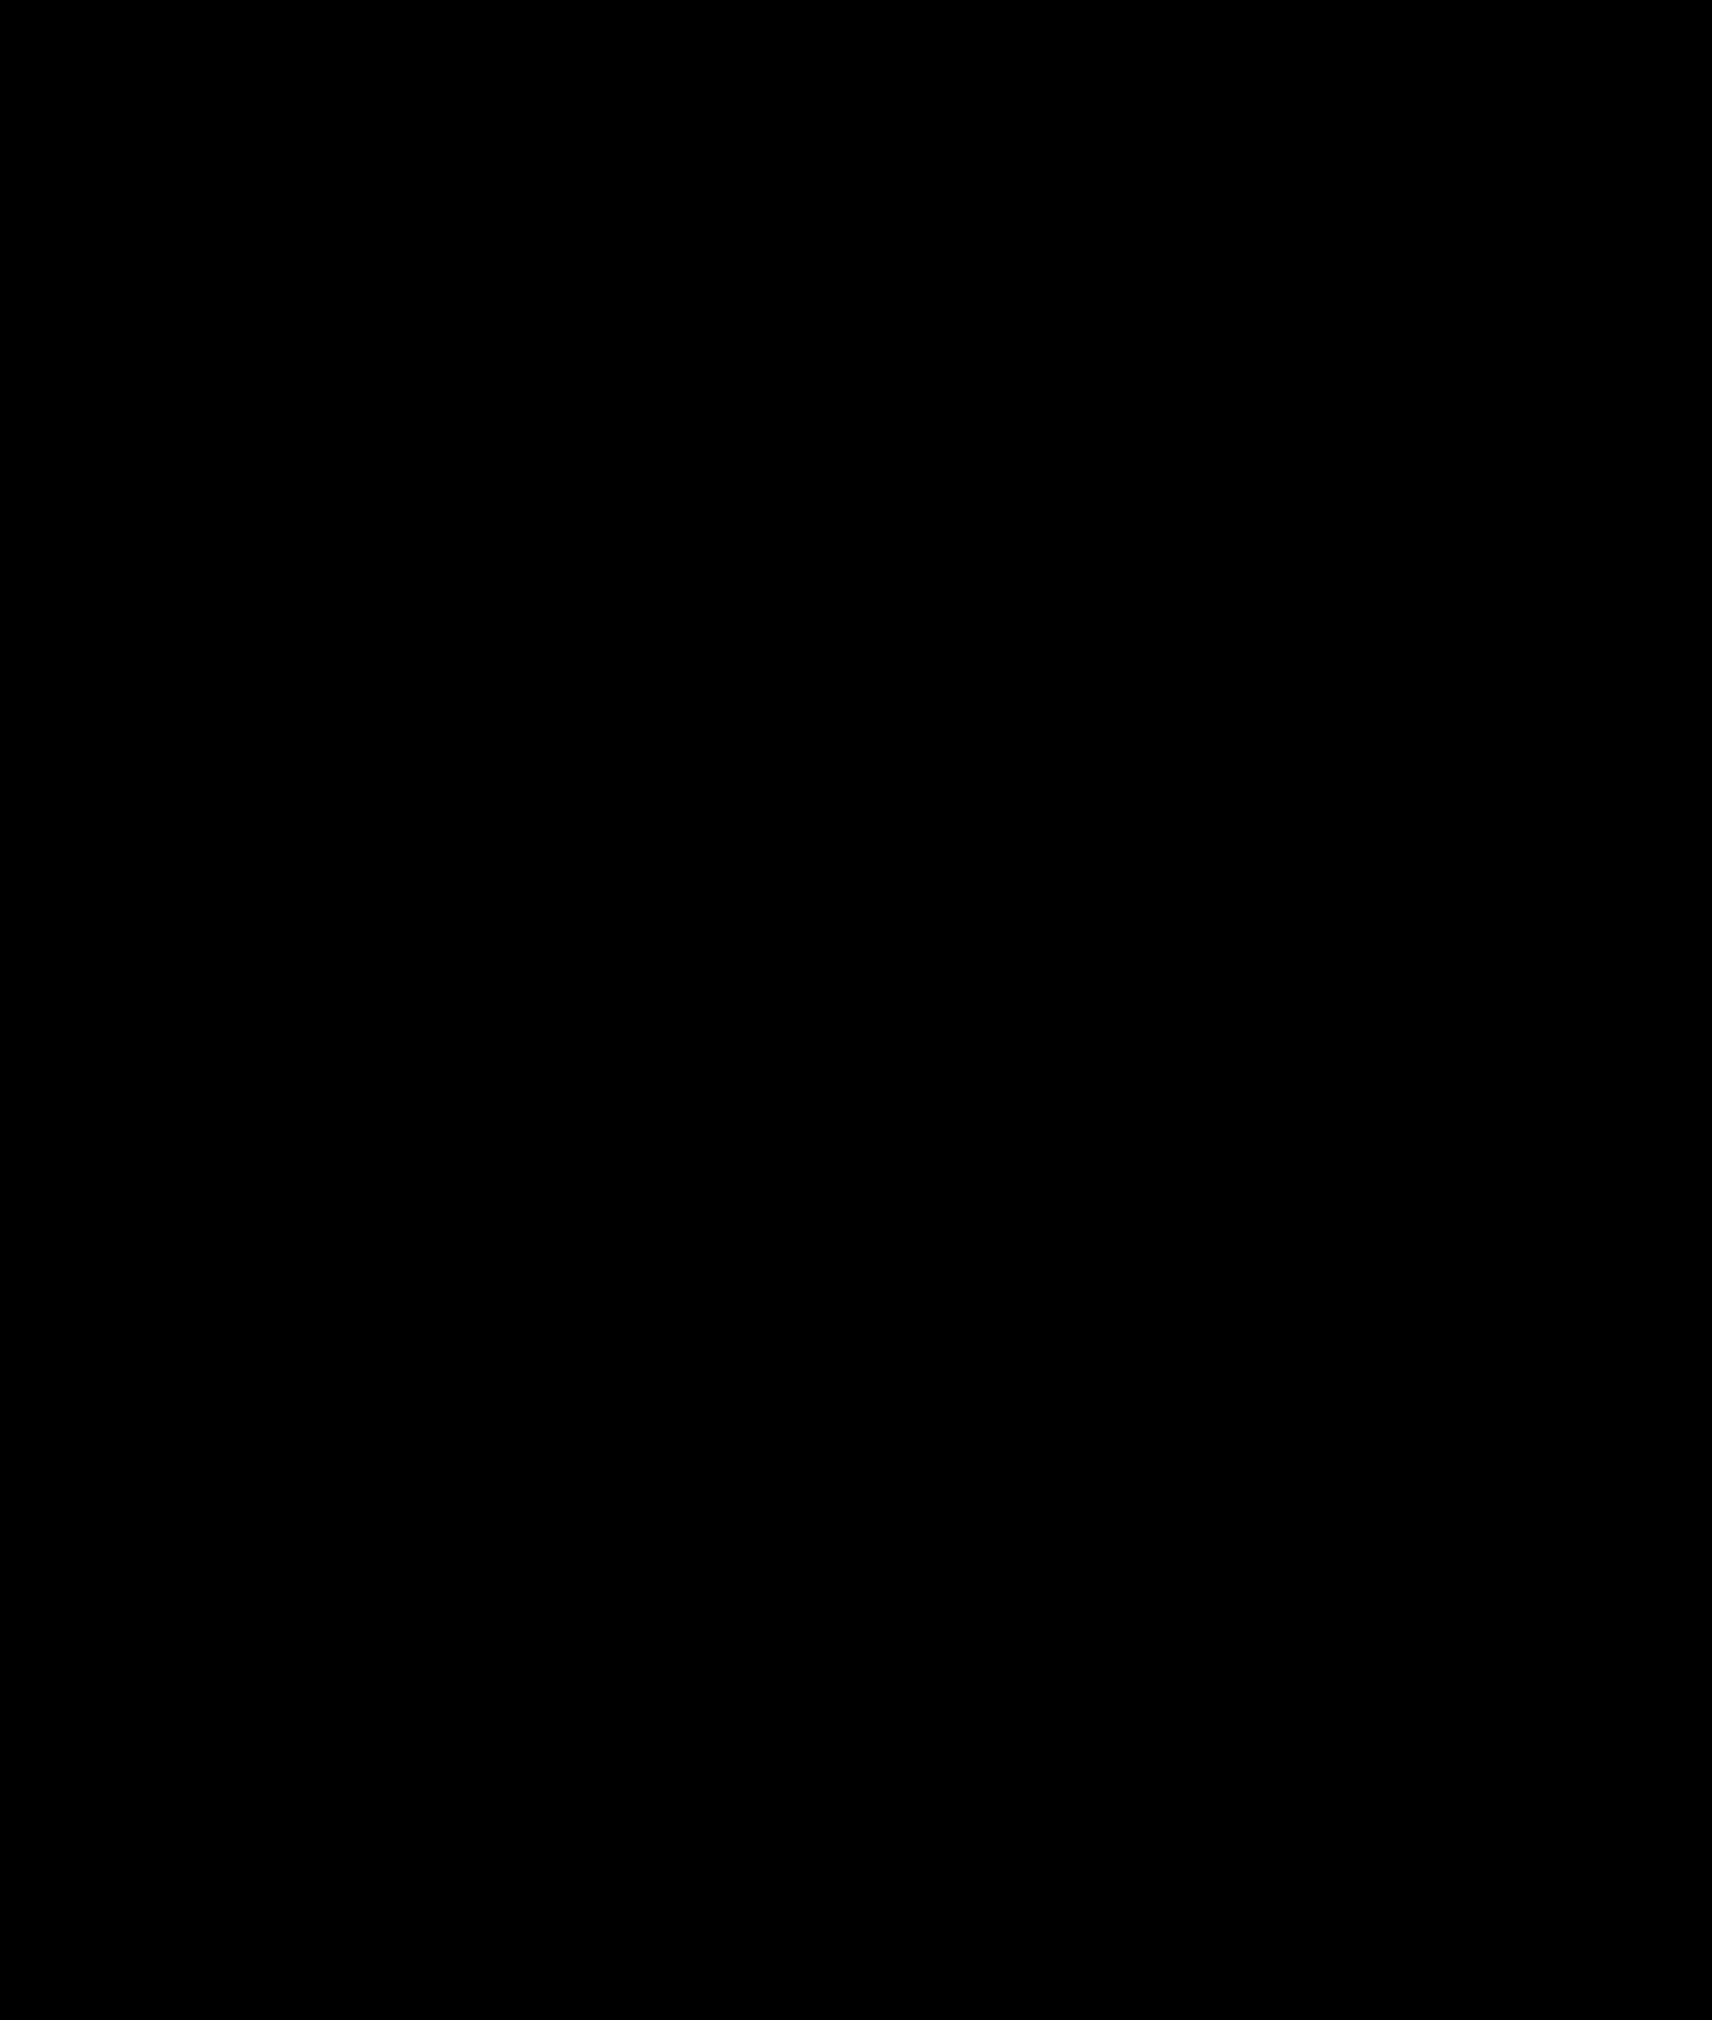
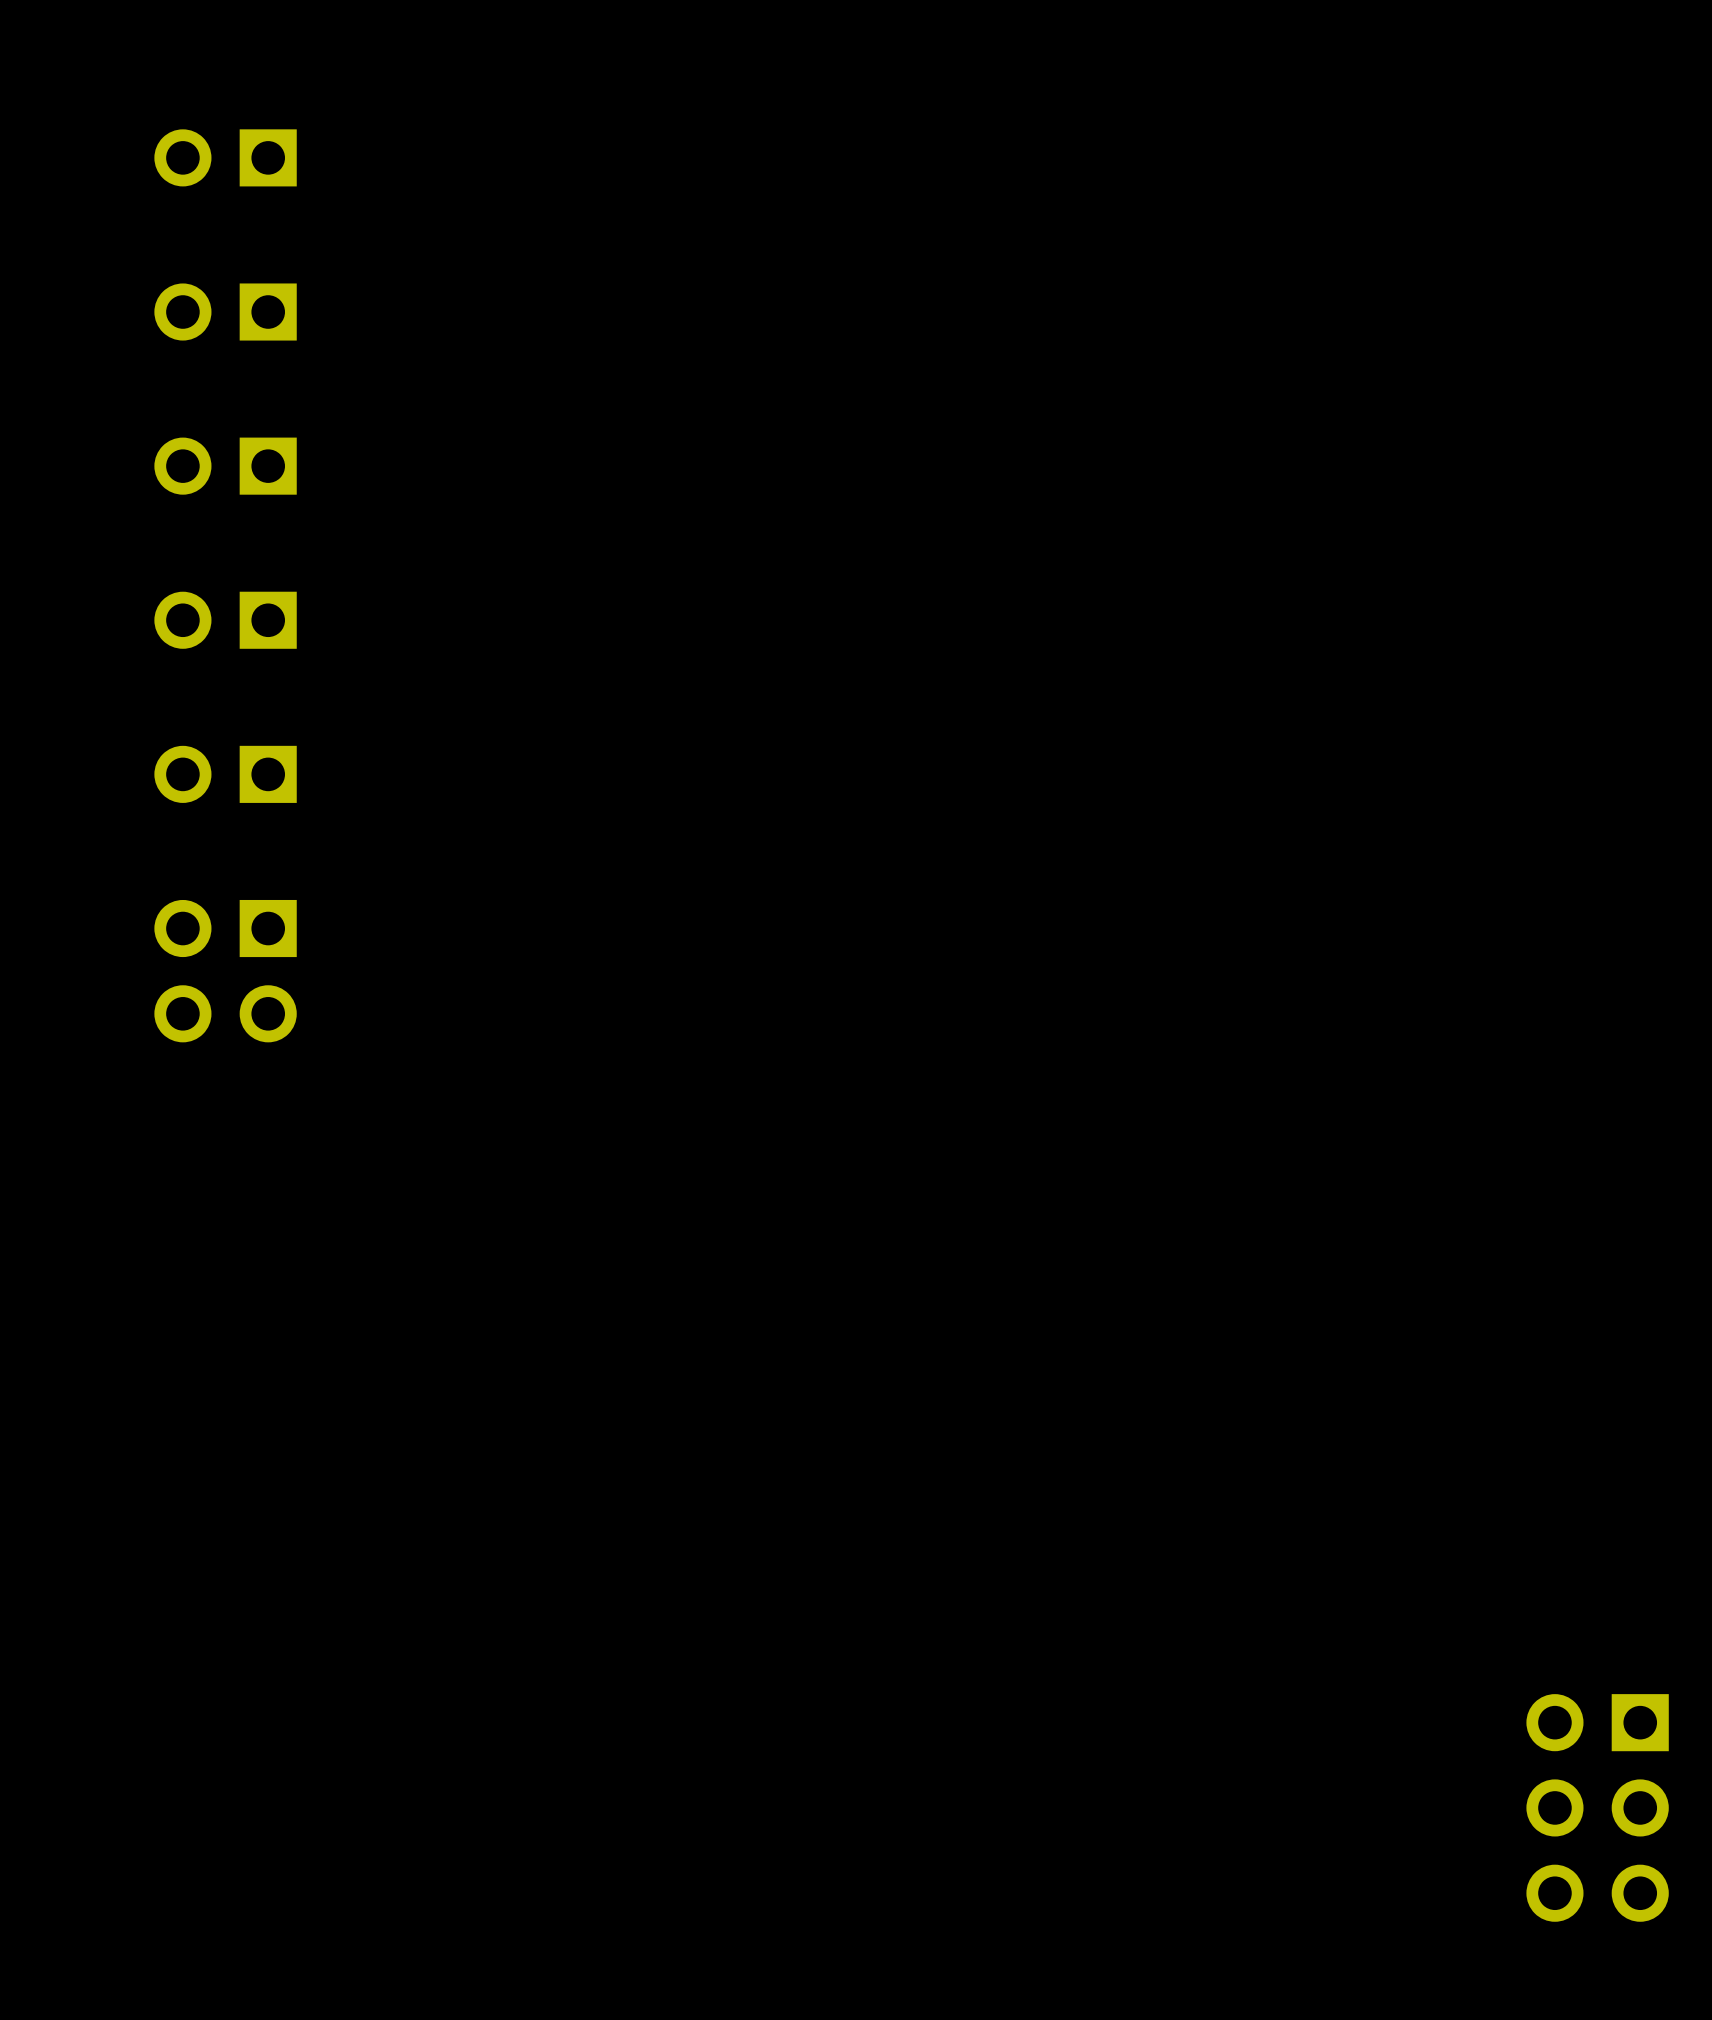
part: none -> (225, 157)
part: none -> (225, 312)
part: none -> (225, 466)
part: none -> (225, 620)
part: none -> (225, 774)
part: none -> (225, 971)
part: none -> (1597, 1807)

